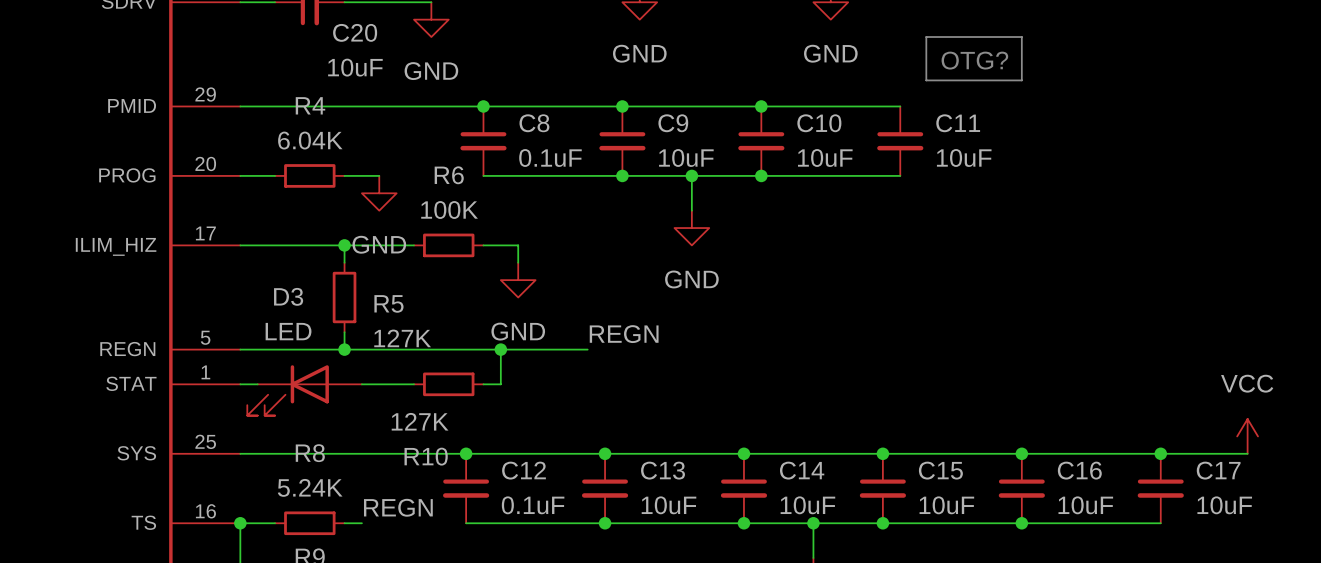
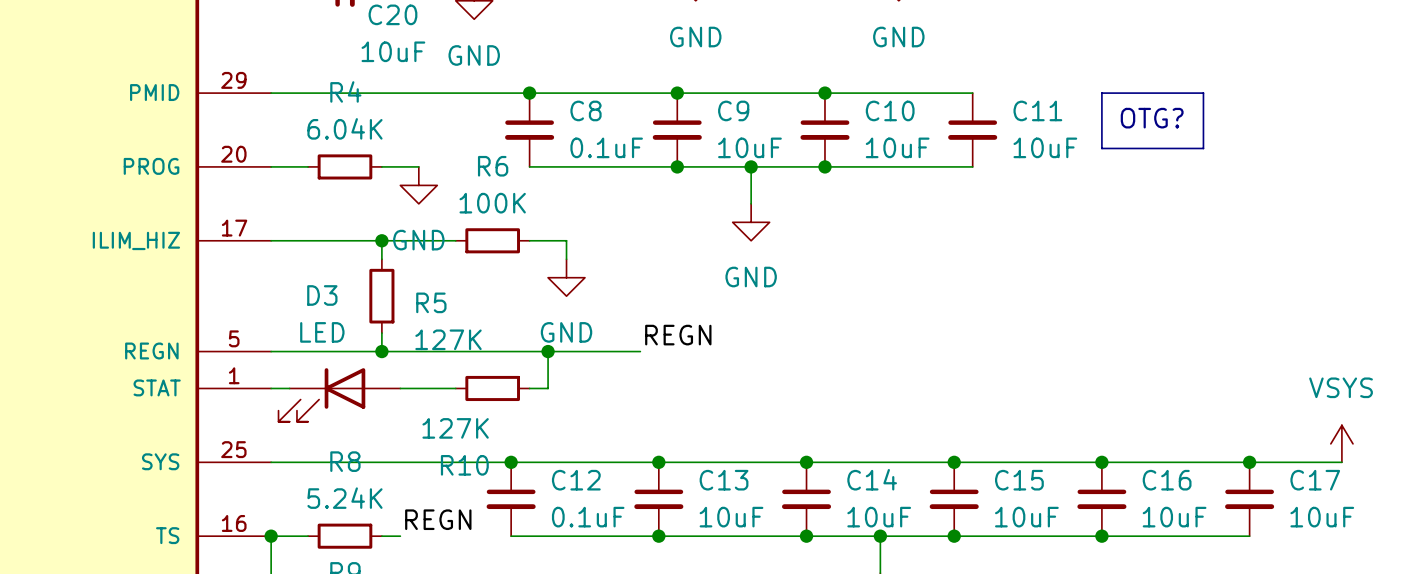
line: (926, 37) (1021, 37) (1021, 80) (926, 80) (926, 37) -> none
text position: OTG? (974, 60) -> OTG? (1152, 118)
line: none -> (1101, 93) (1203, 93) (1203, 148) (1101, 148) (1101, 93)
power symbol: VCC (1247, 436) -> VSYS (1341, 443)

